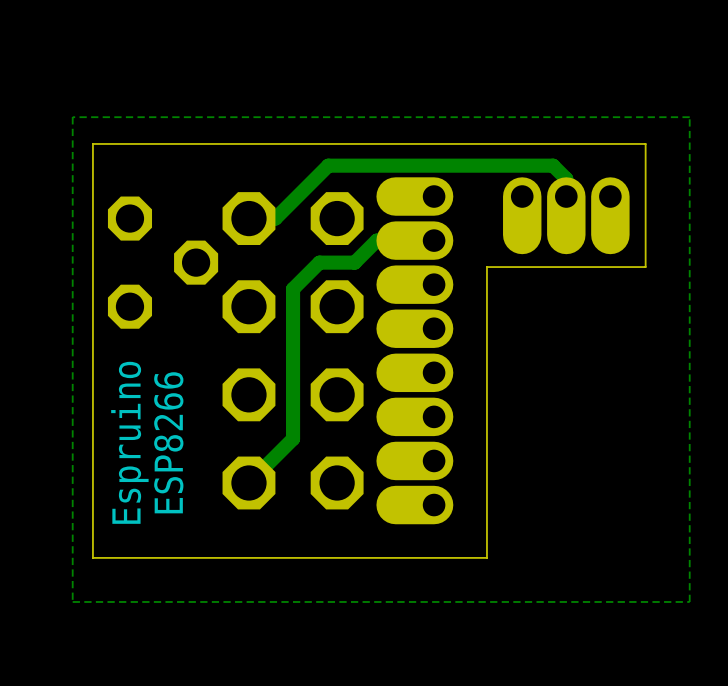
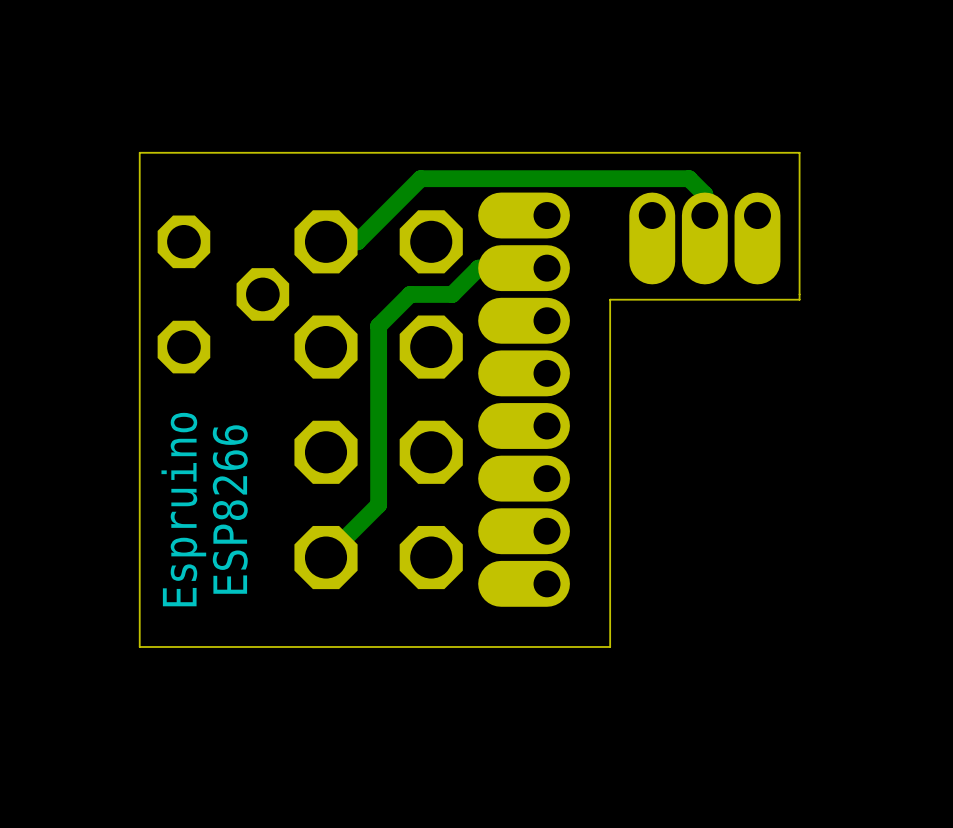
zone outline: (689, 117) (72, 117) (72, 601) (689, 601) (689, 117) -> none

